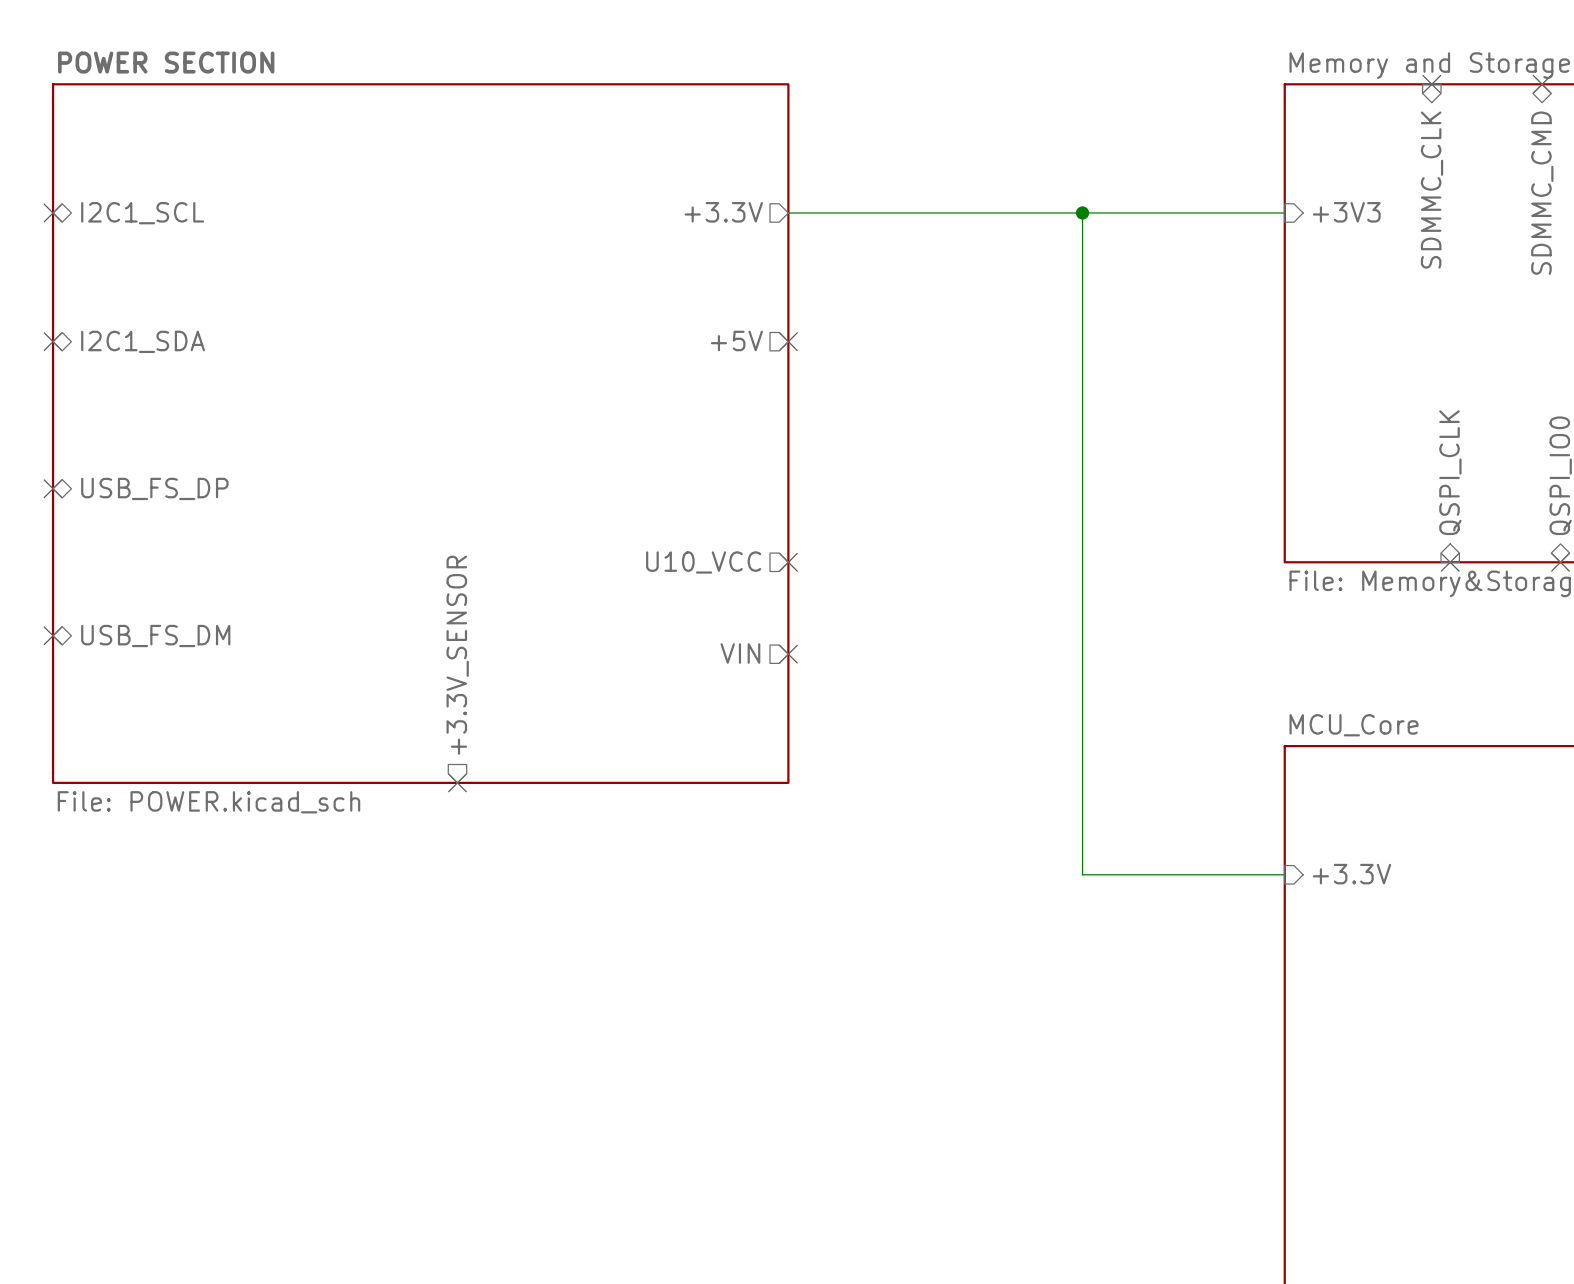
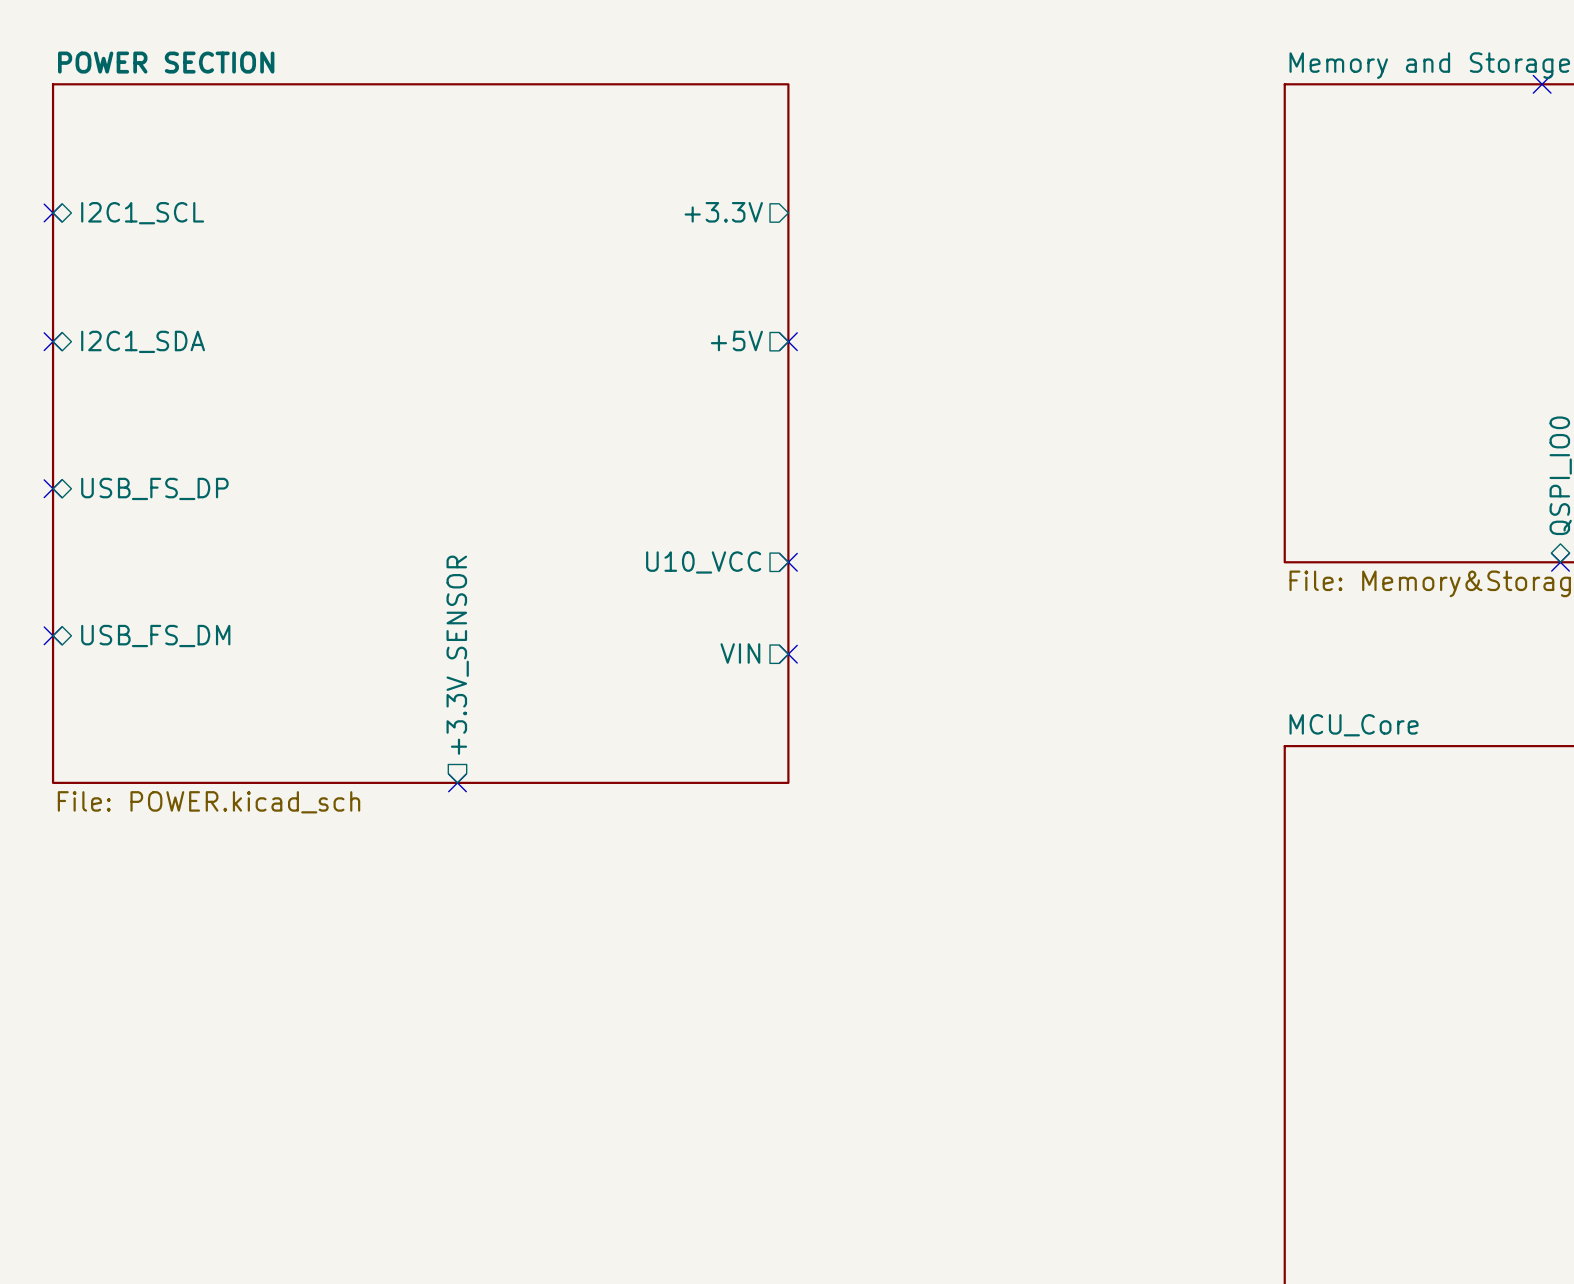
no-connect mark: (1431, 84) -> none
sheet pin: SDMMC_CLK (1432, 190) -> none
sheet pin: SDMMC_CMD (1542, 193) -> none
wire: (788, 212) (1284, 212) -> none
wire: (1082, 212) (1082, 874) (1284, 874) -> none
junction: (1082, 212) -> none
sheet pin: +3V3 (1346, 212) -> none
sheet pin: QSPI_CLK (1450, 472) -> none
no-connect mark: (1450, 562) -> none
sheet pin: +3.3V (1352, 874) -> none

